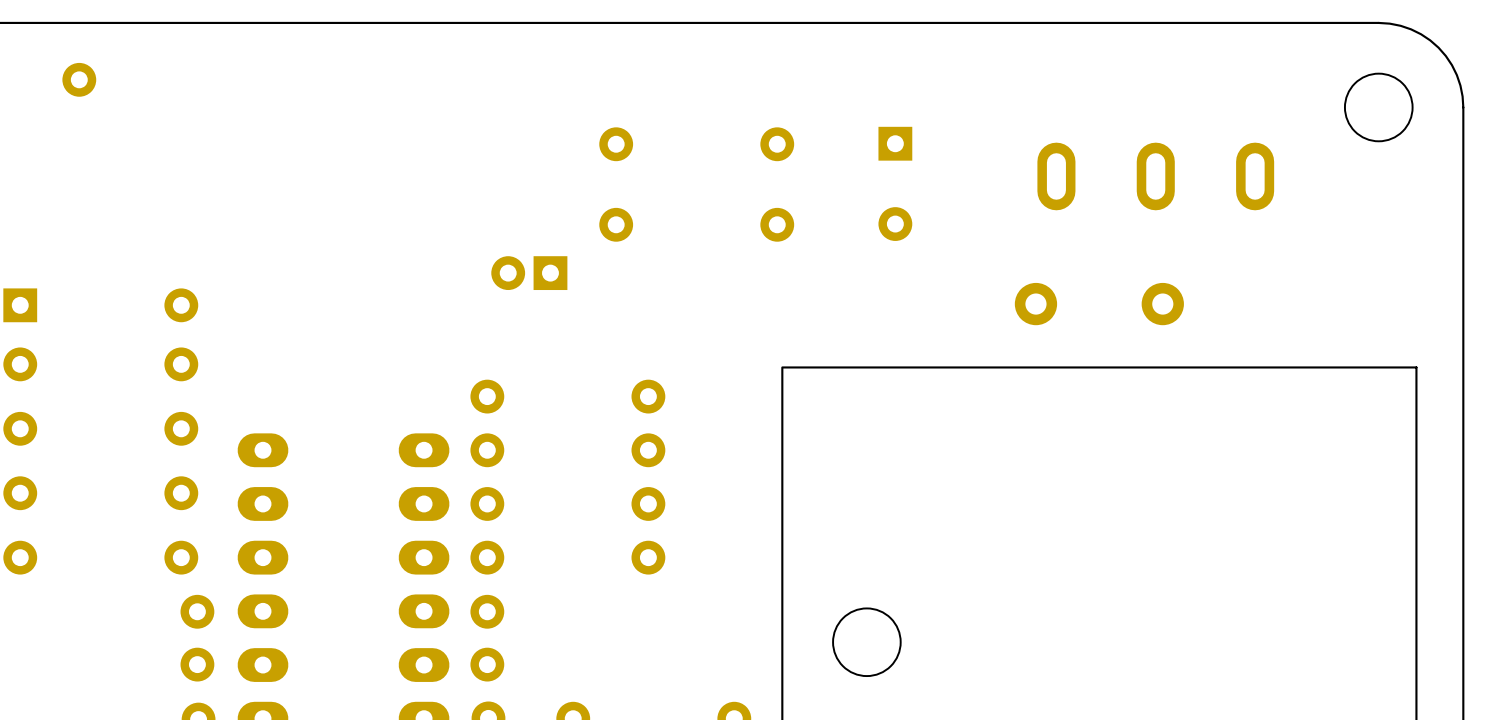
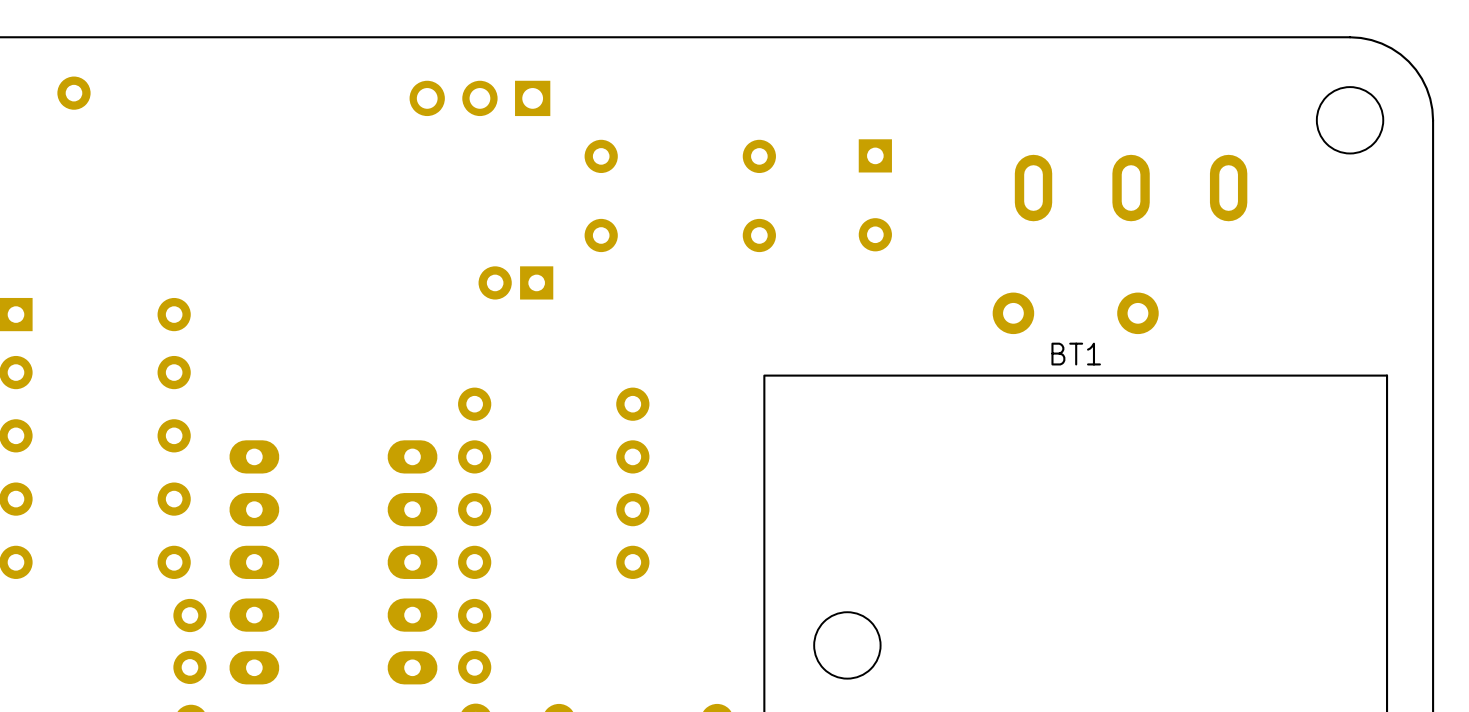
part: none -> (479, 98)
BT1 name: none -> BT1 (1076, 354)

